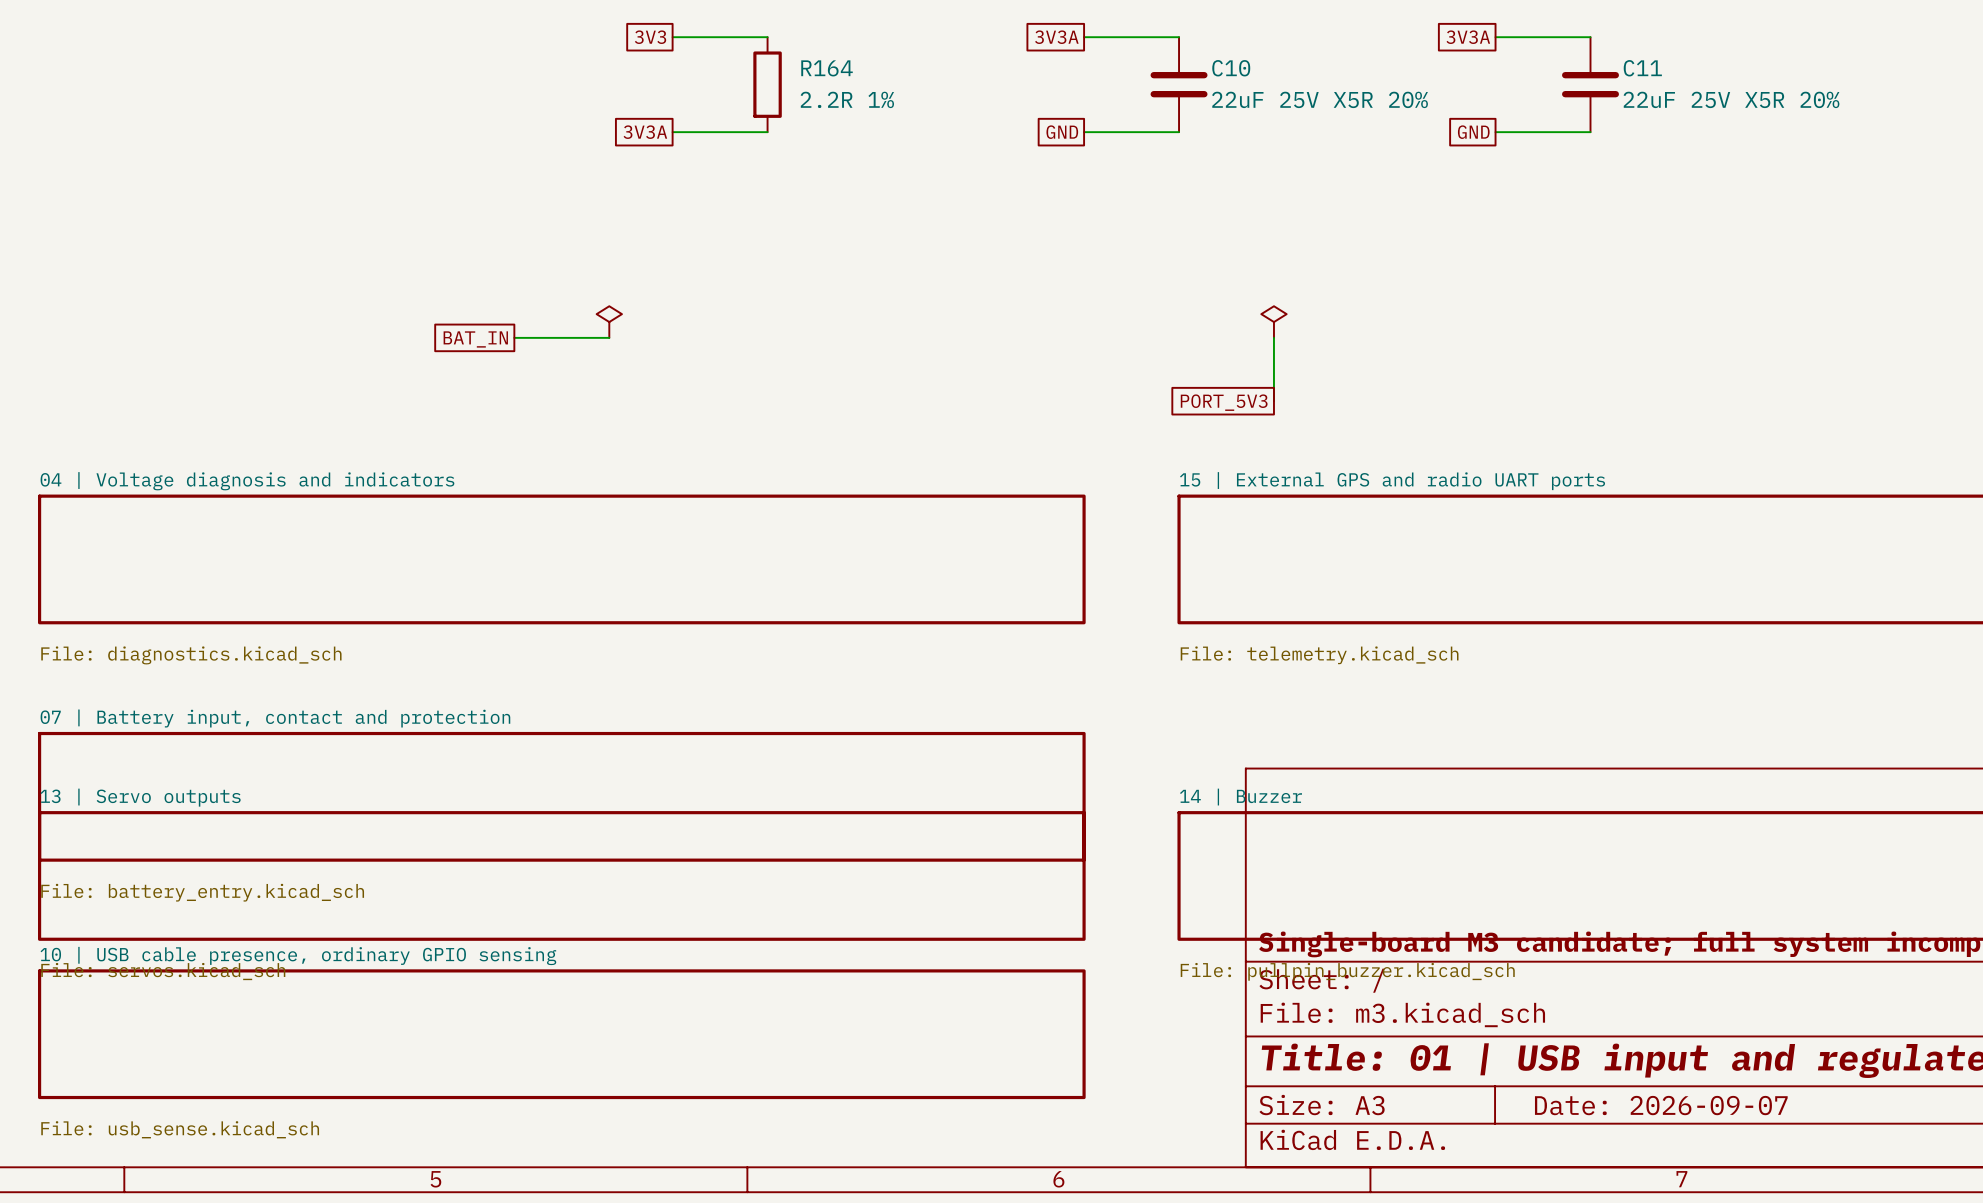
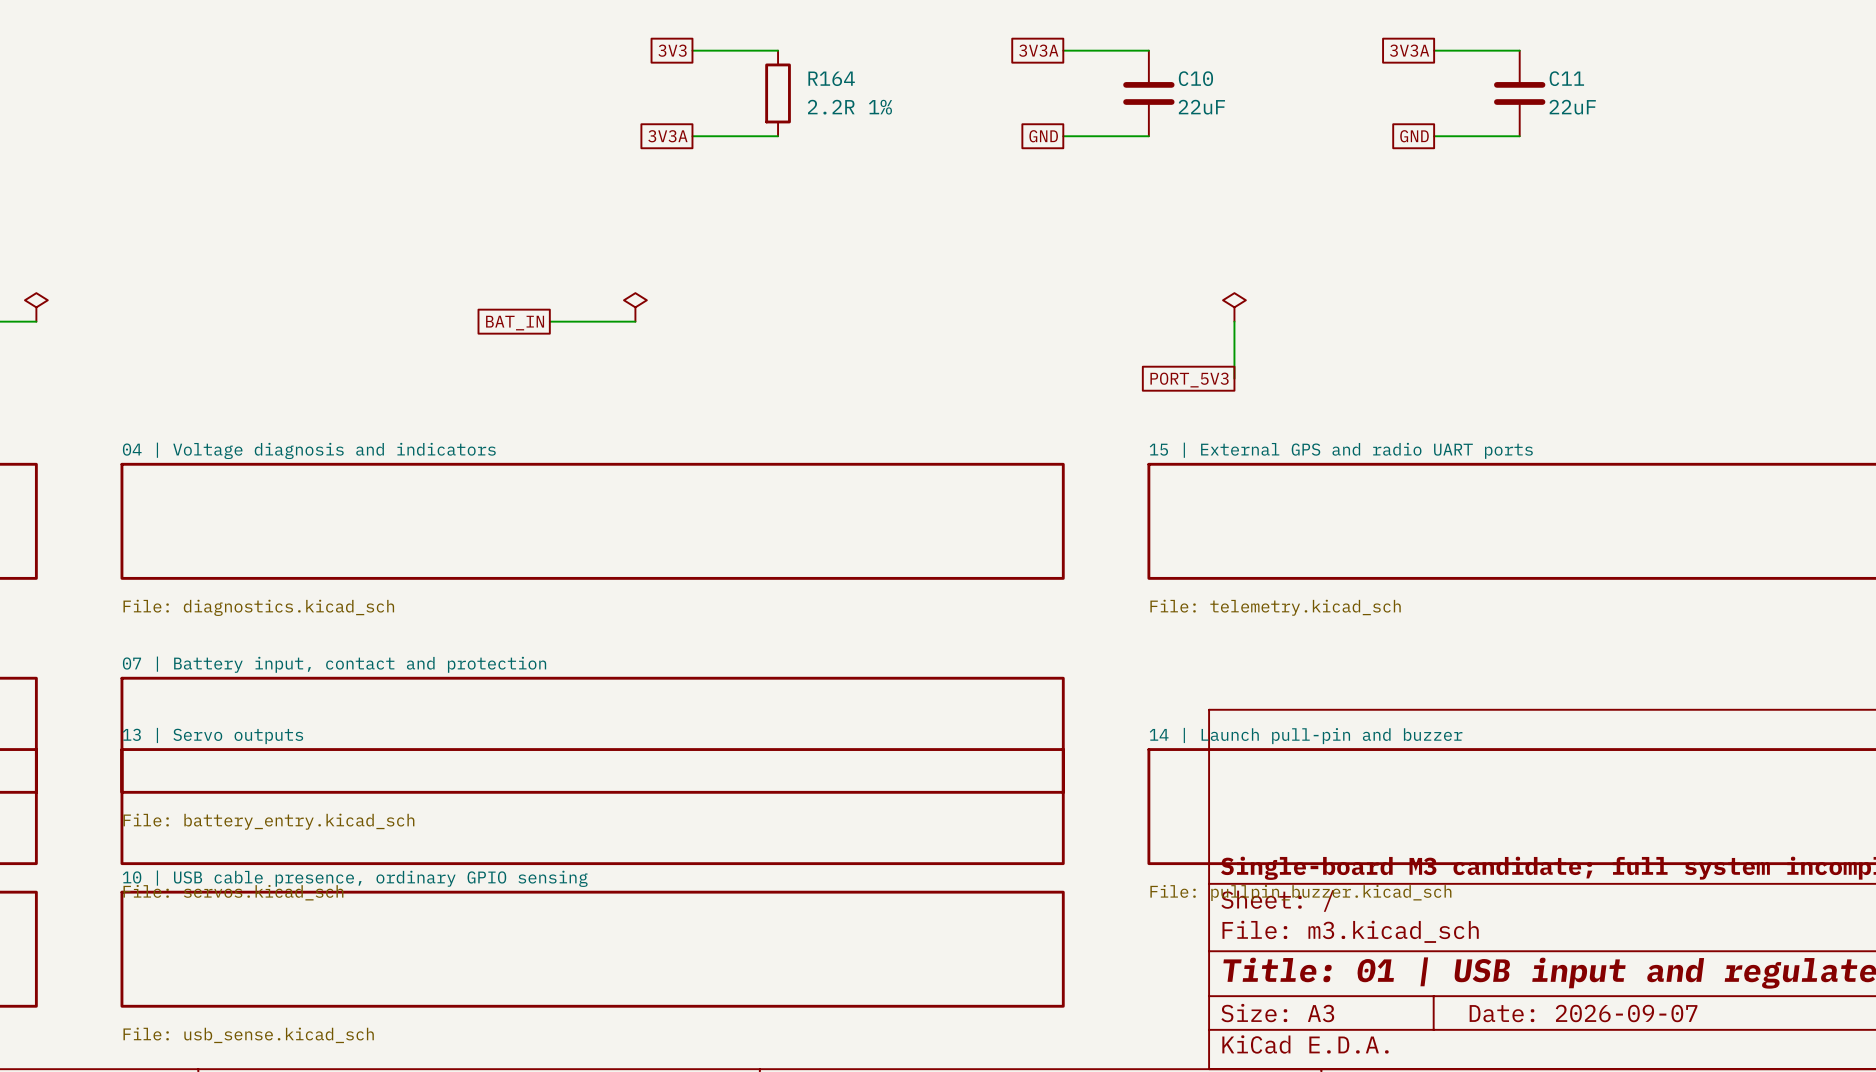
C10 value: 22uF 25V X5R 20% (1320, 99) -> 22uF (1201, 107)
C11 value: 22uF 25V X5R 20% (1731, 99) -> 22uF (1572, 107)
sheet 14 | Buzzer name: 14 | Buzzer (1241, 797) -> 14 | Launch pull-pin and buzzer (1306, 736)

